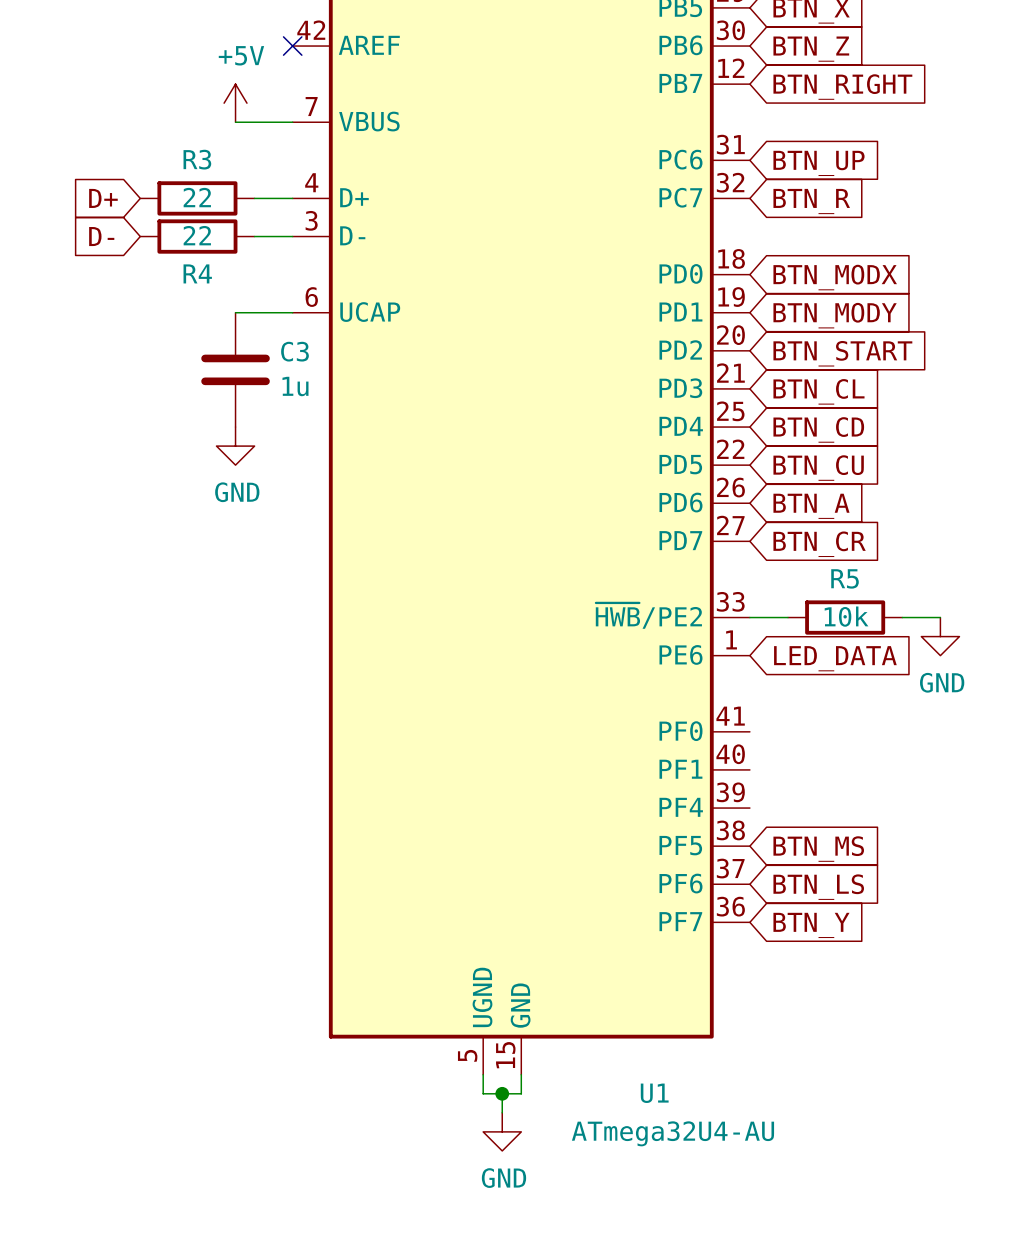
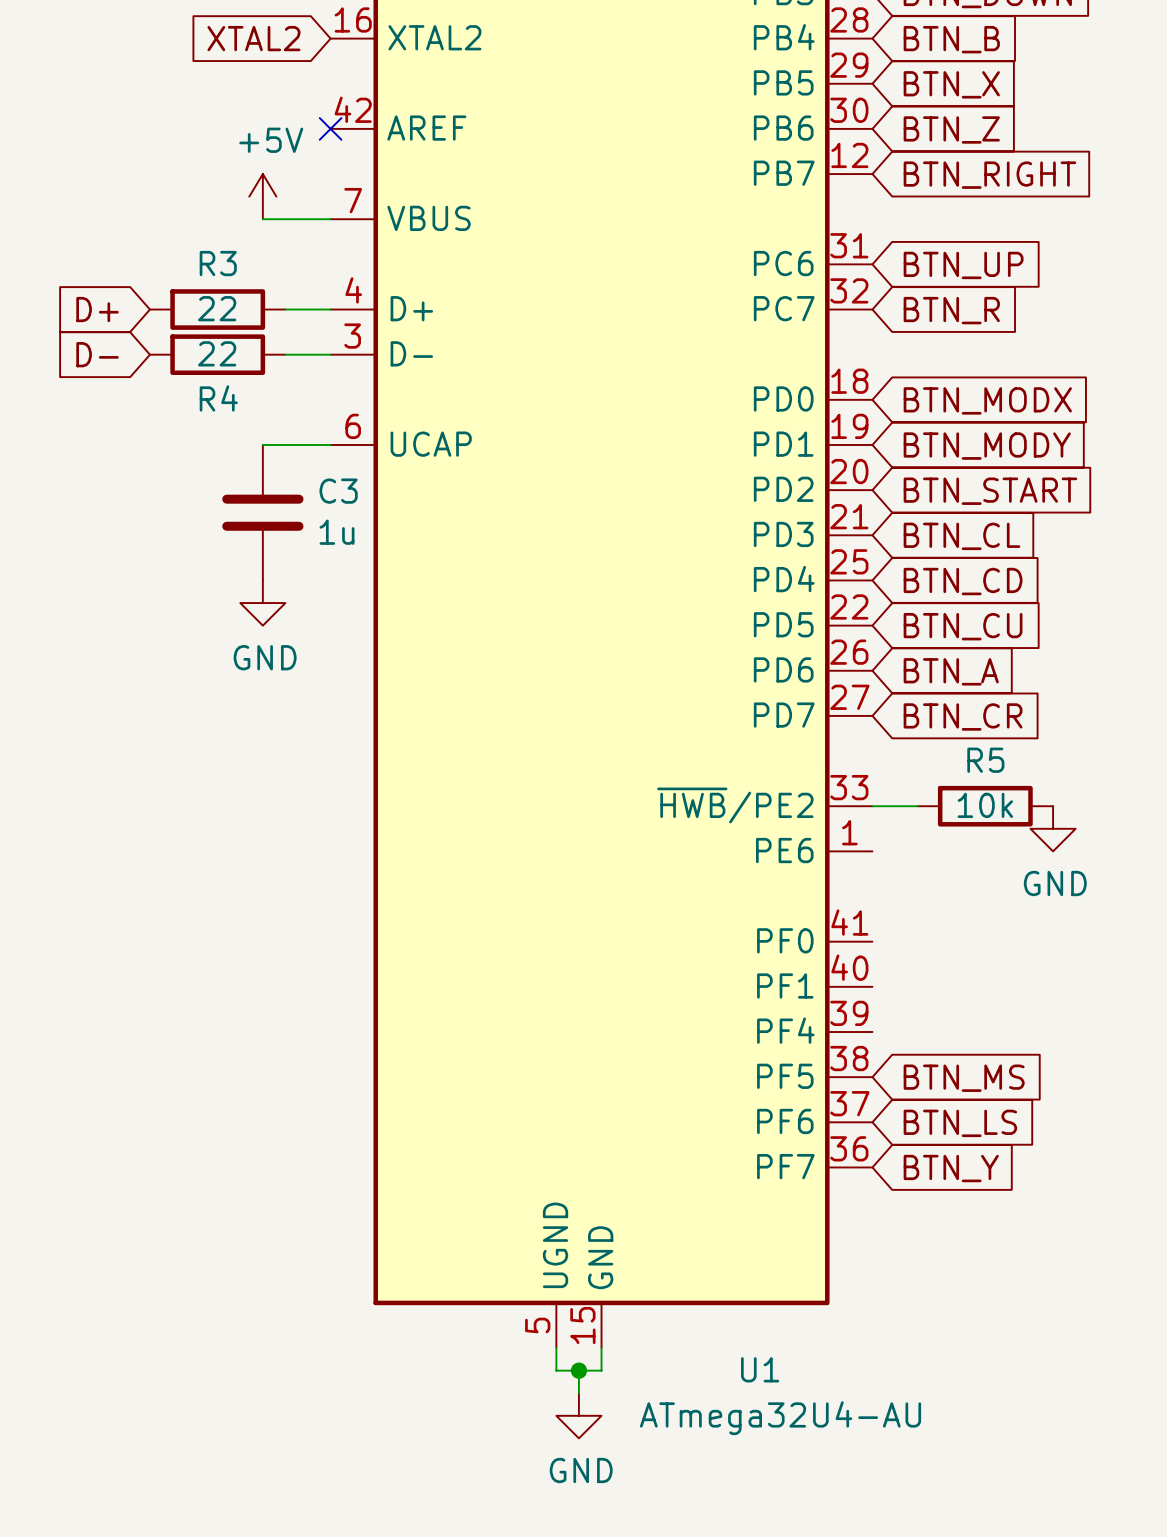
wire: (902, 617) (940, 617) -> none
power symbol position: GND (940, 636) -> GND (1053, 828)
global label: LED_DATA (835, 658) -> none

